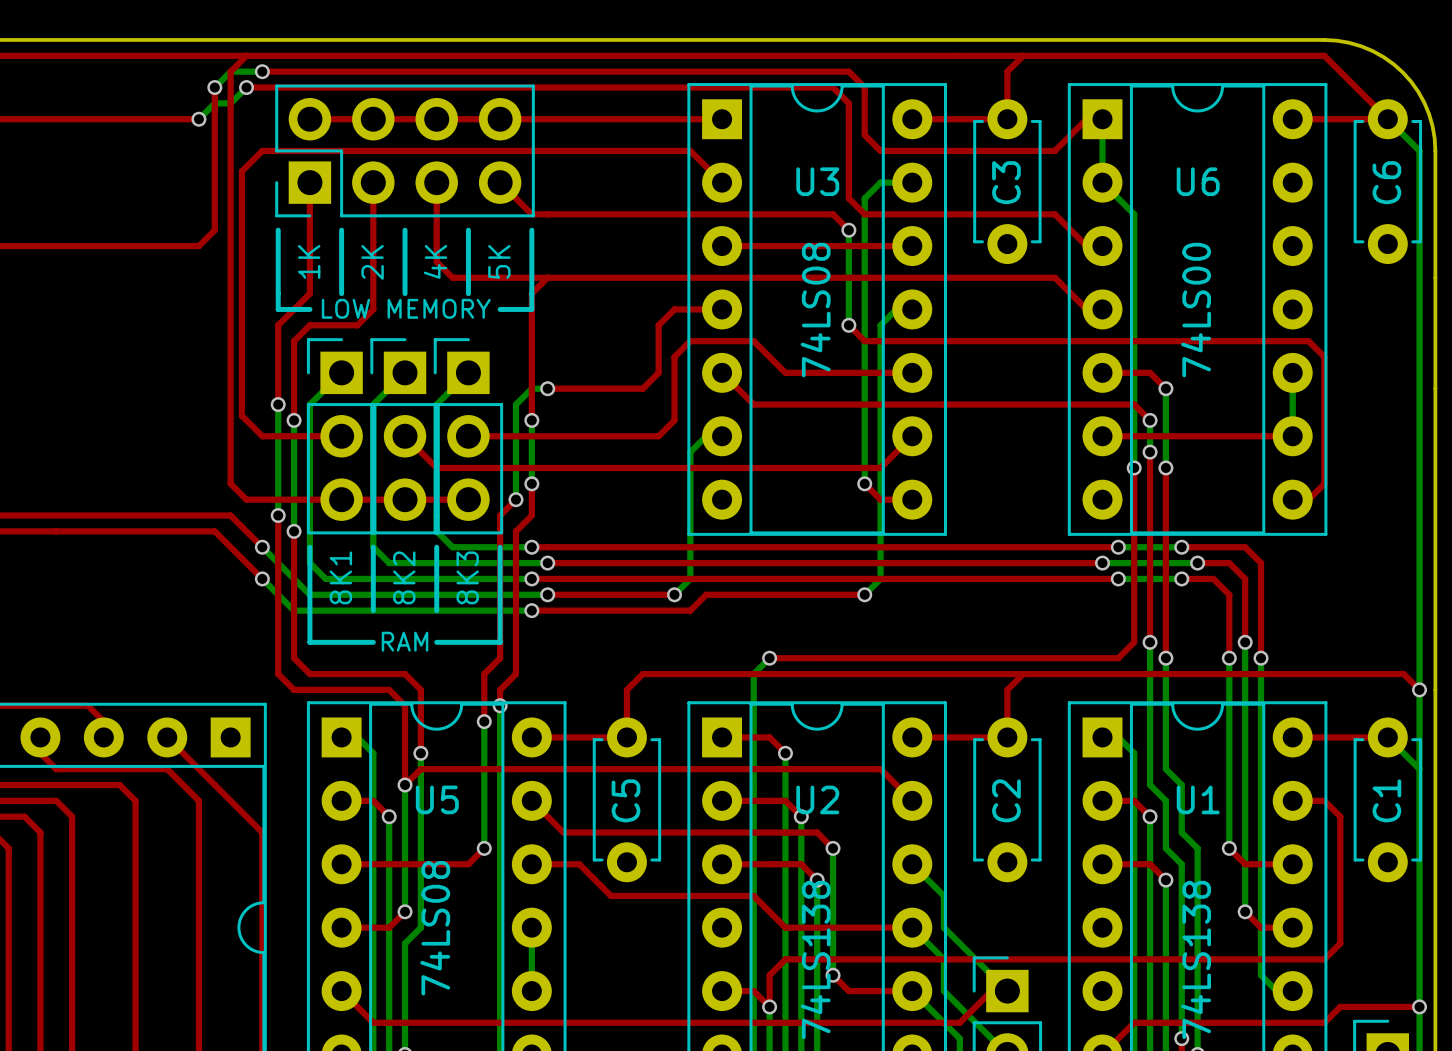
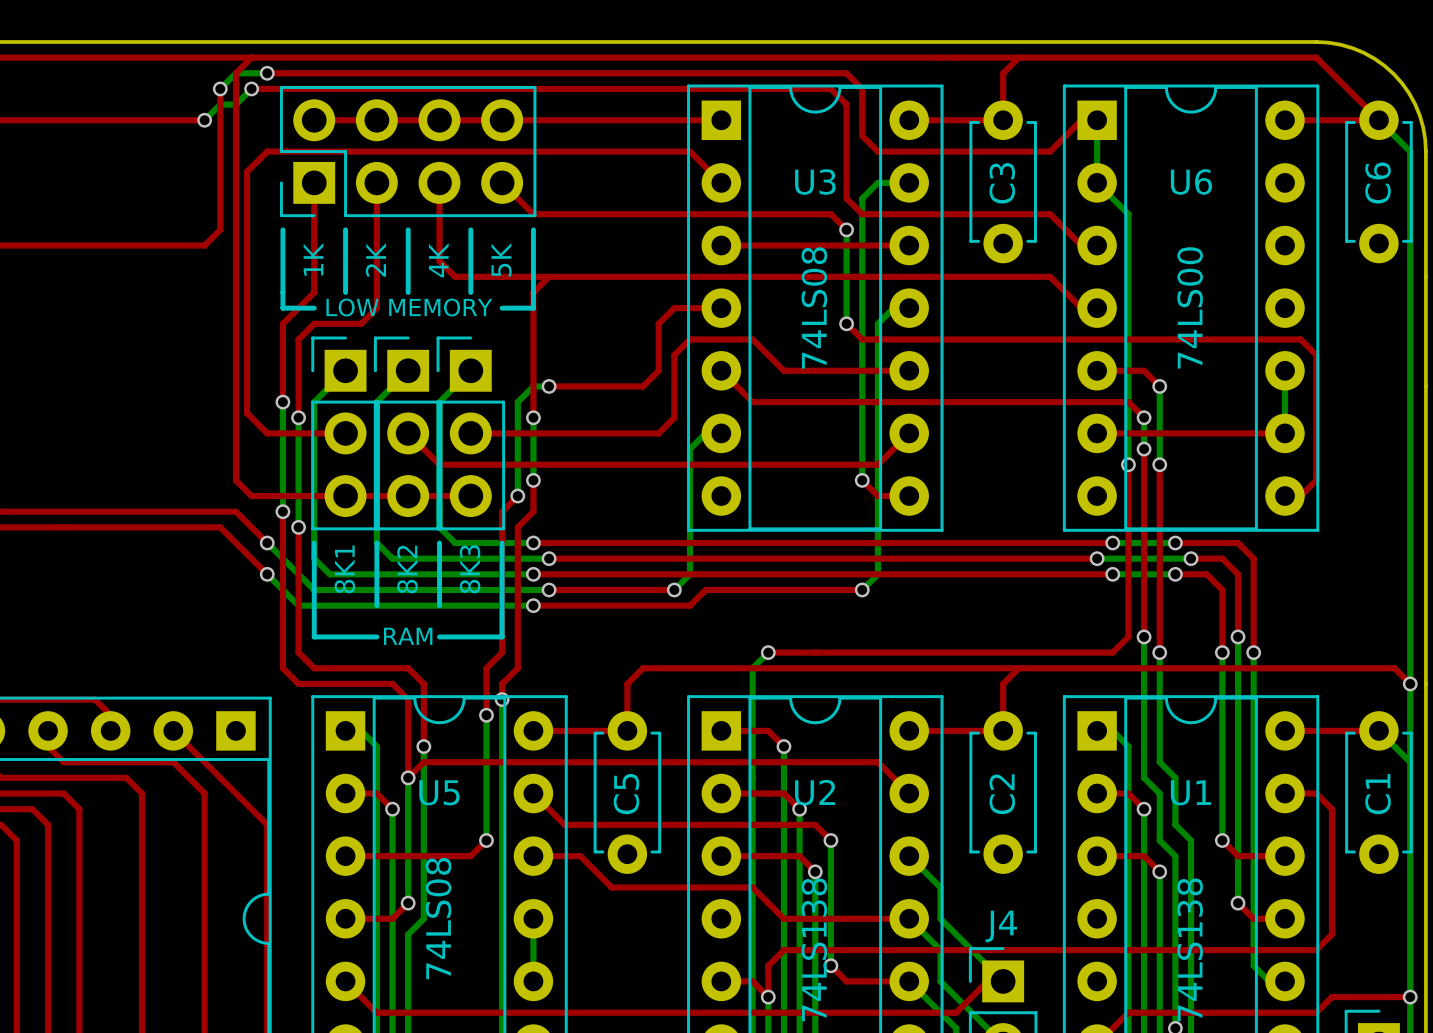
J4 name: none -> J4 (1001, 926)

